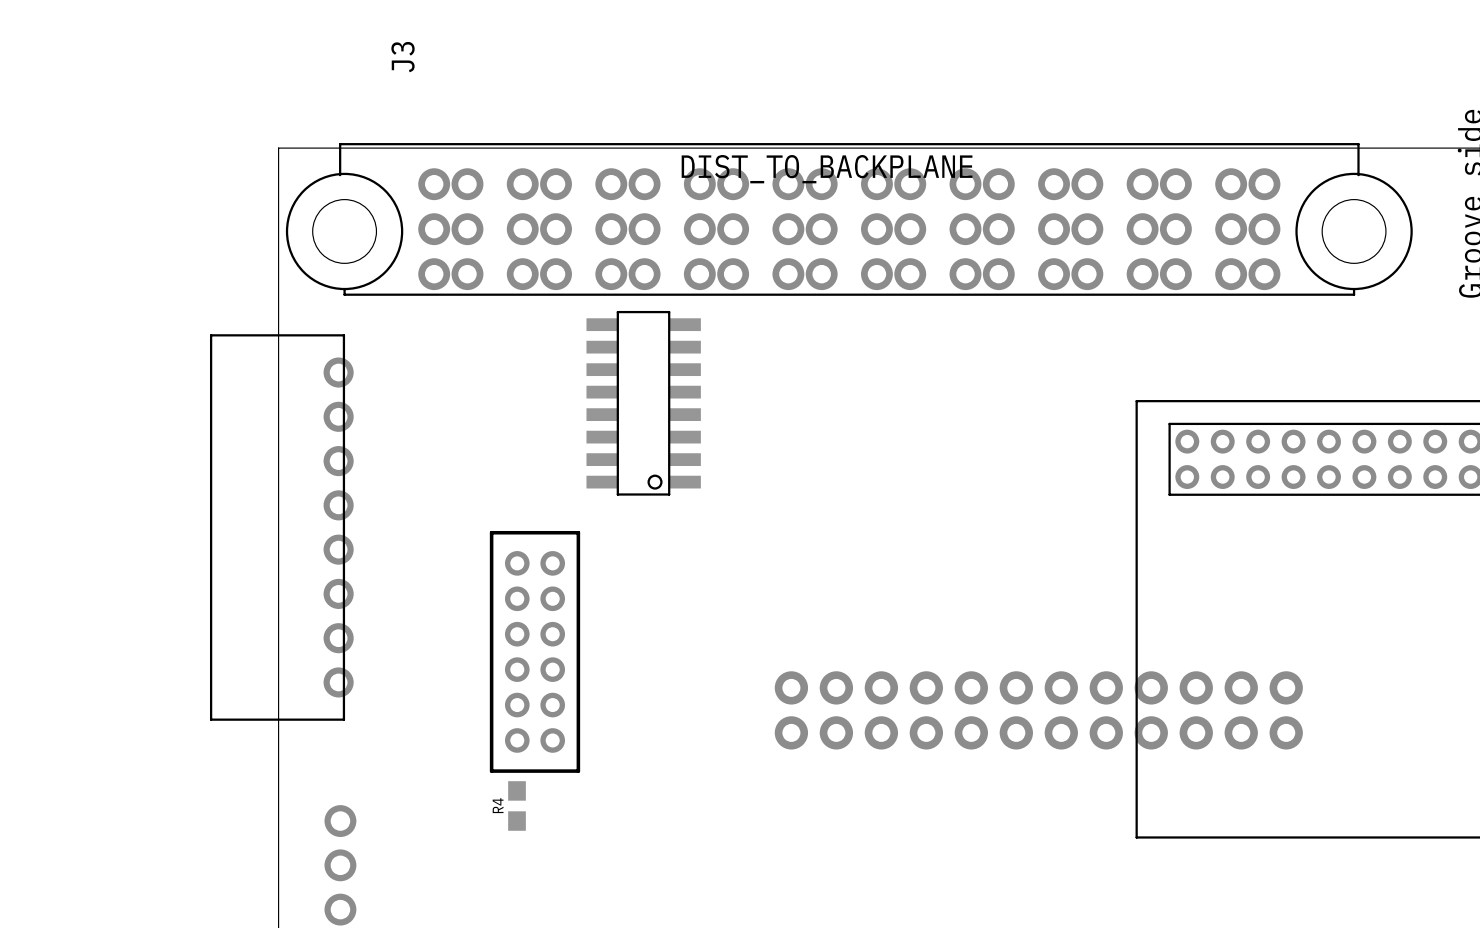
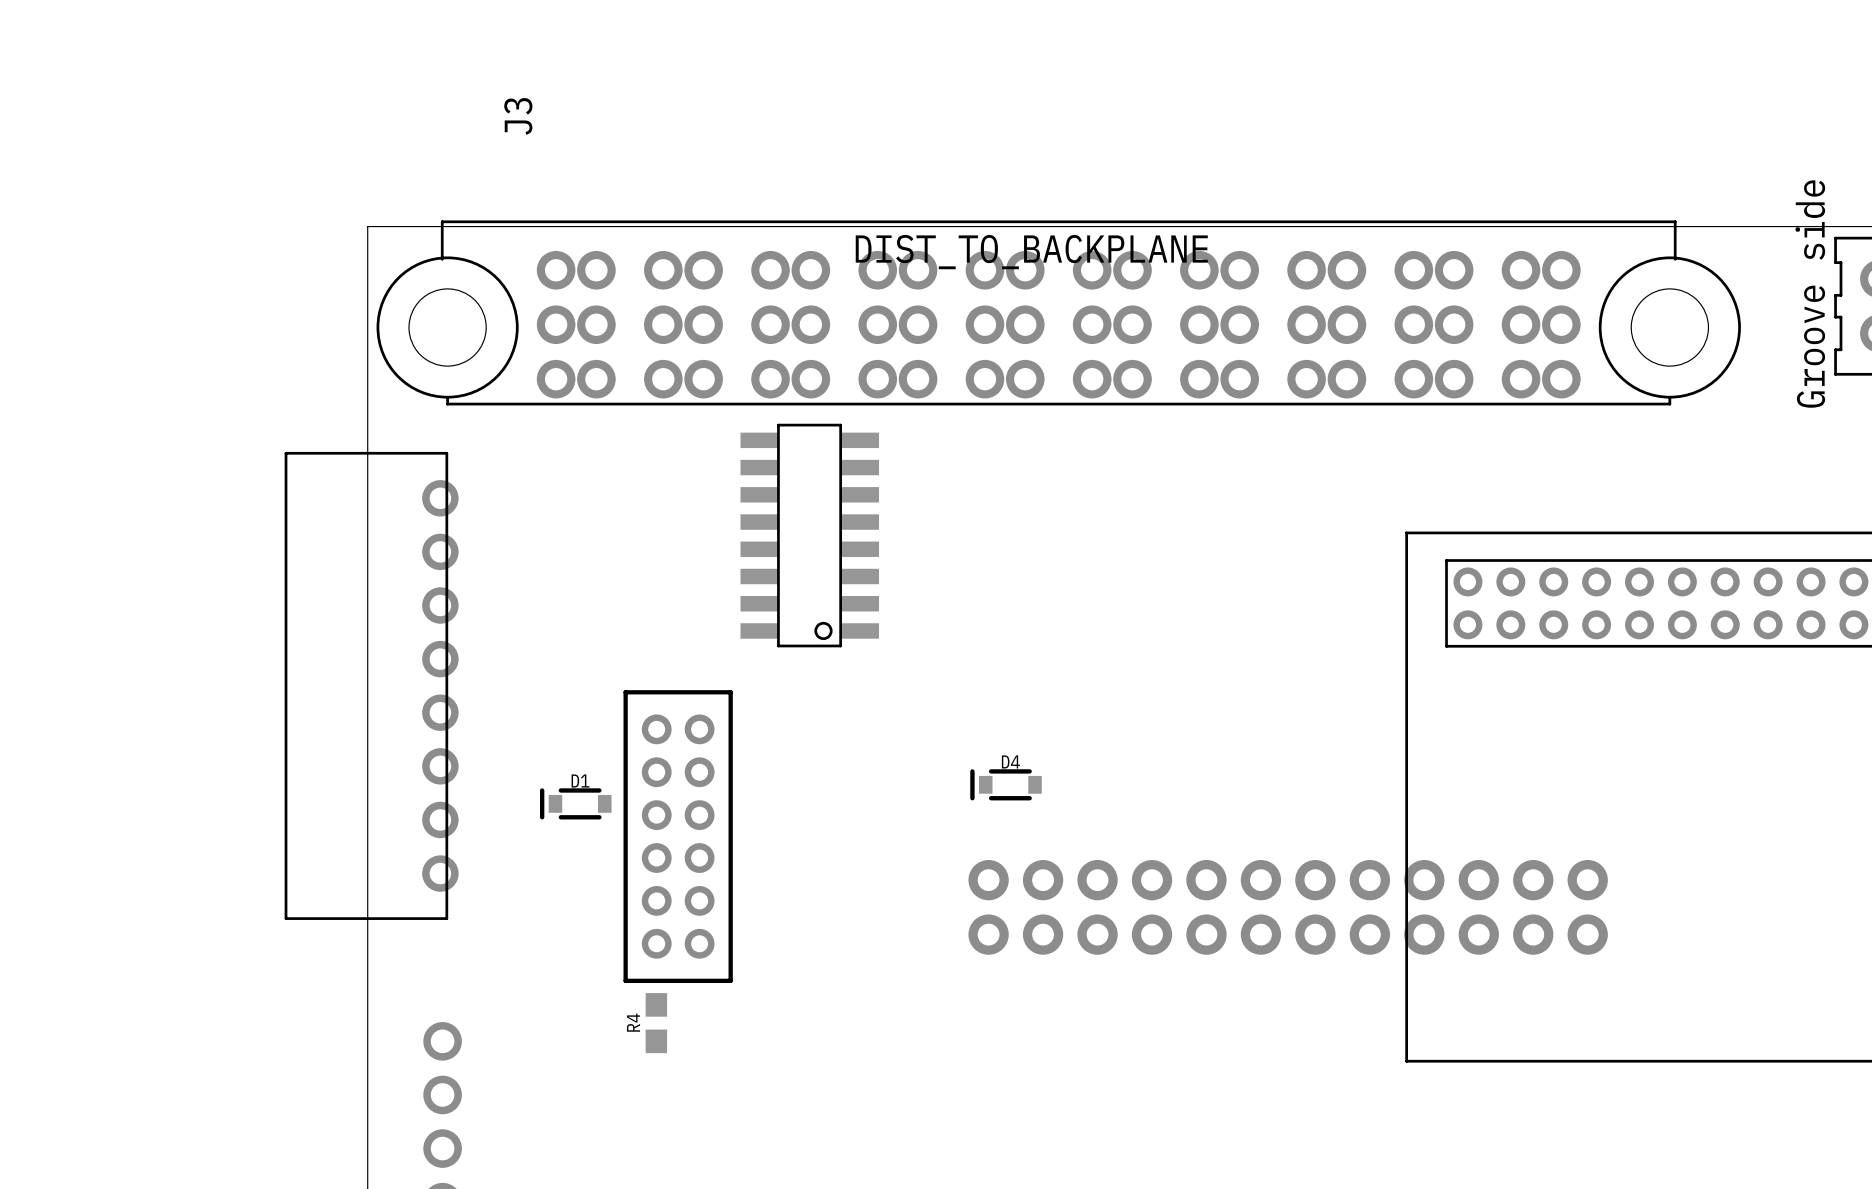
D4: none -> (1006, 784)
D1: none -> (575, 803)

